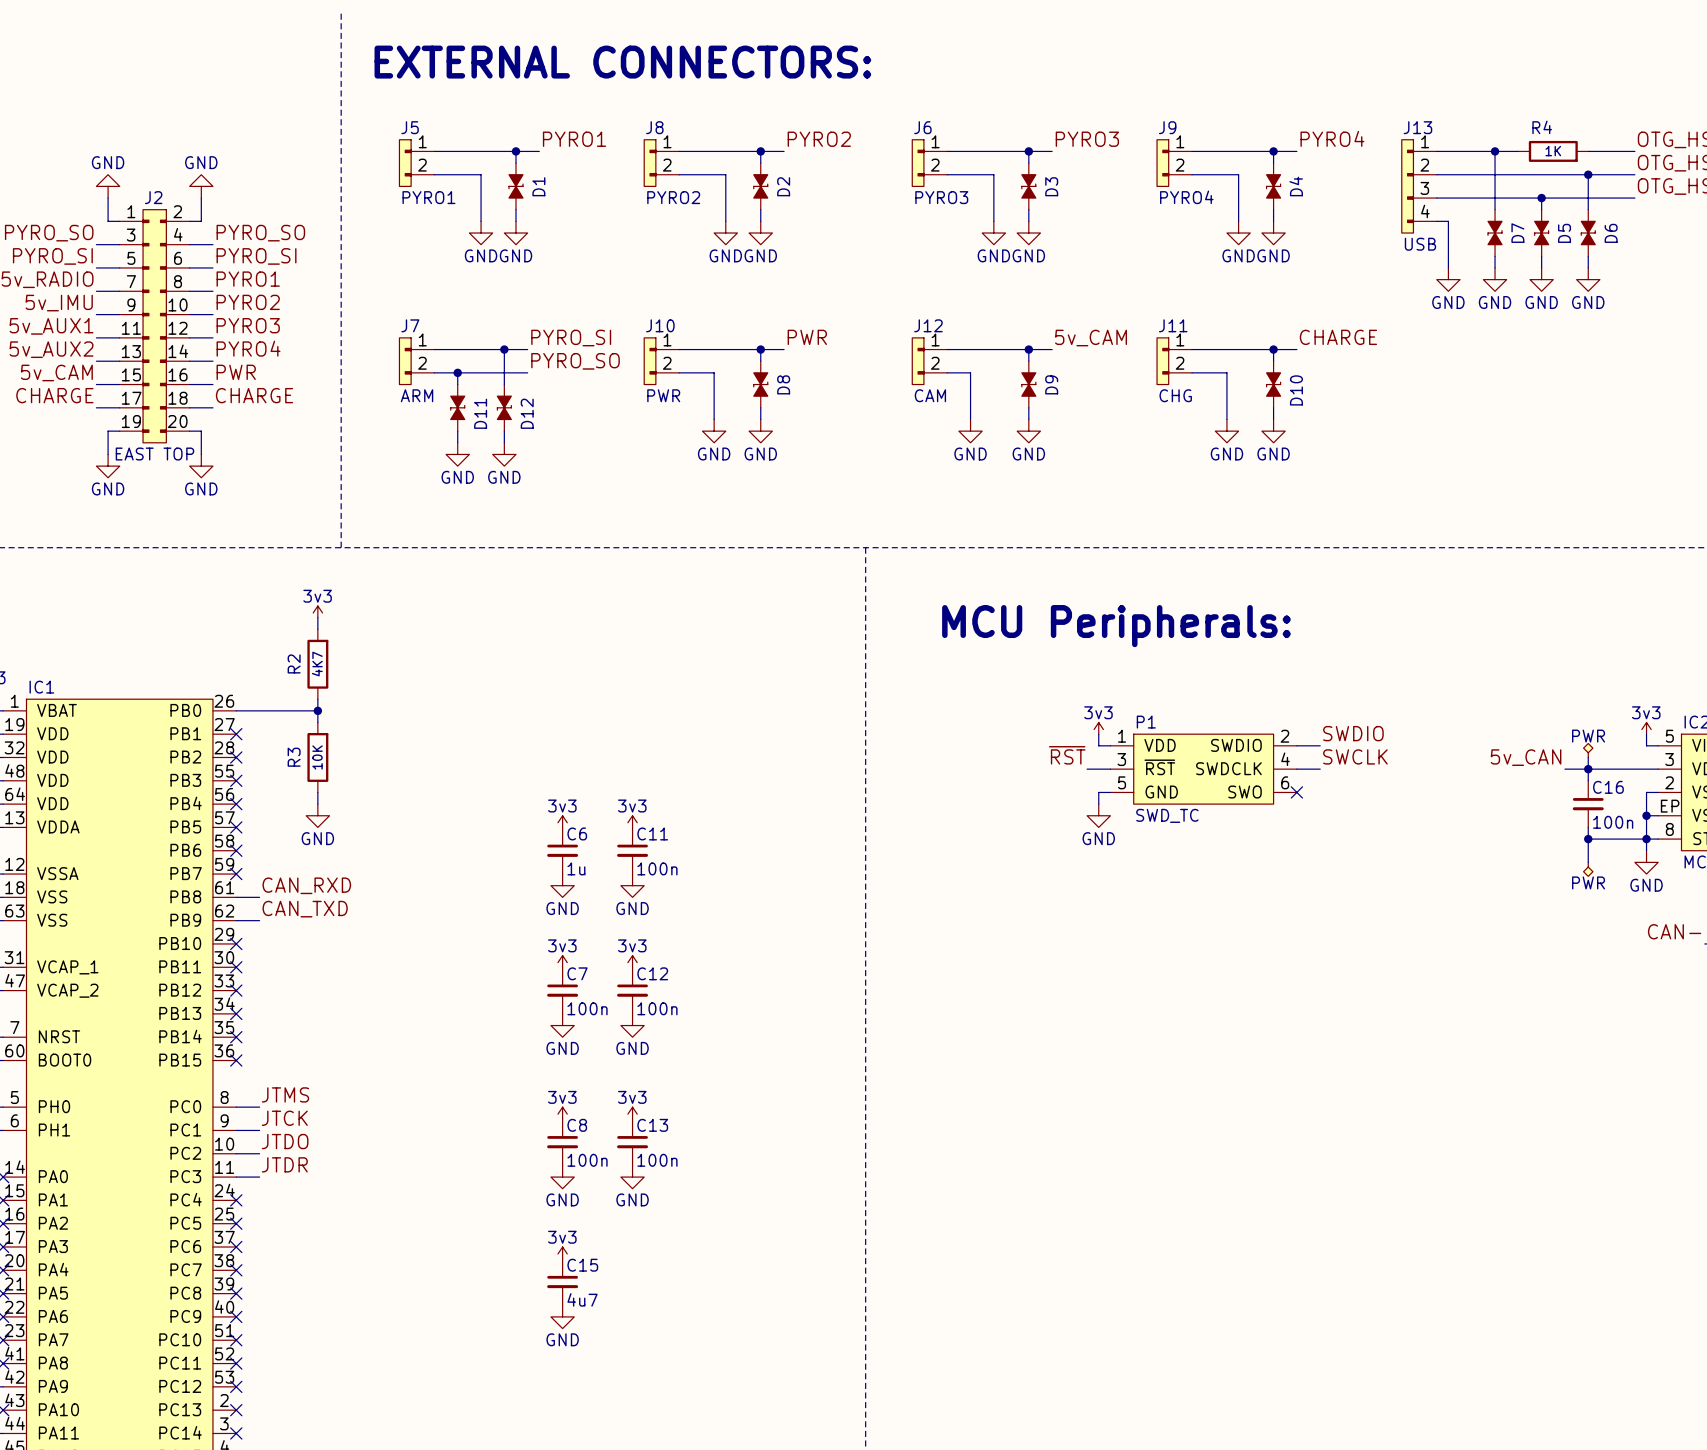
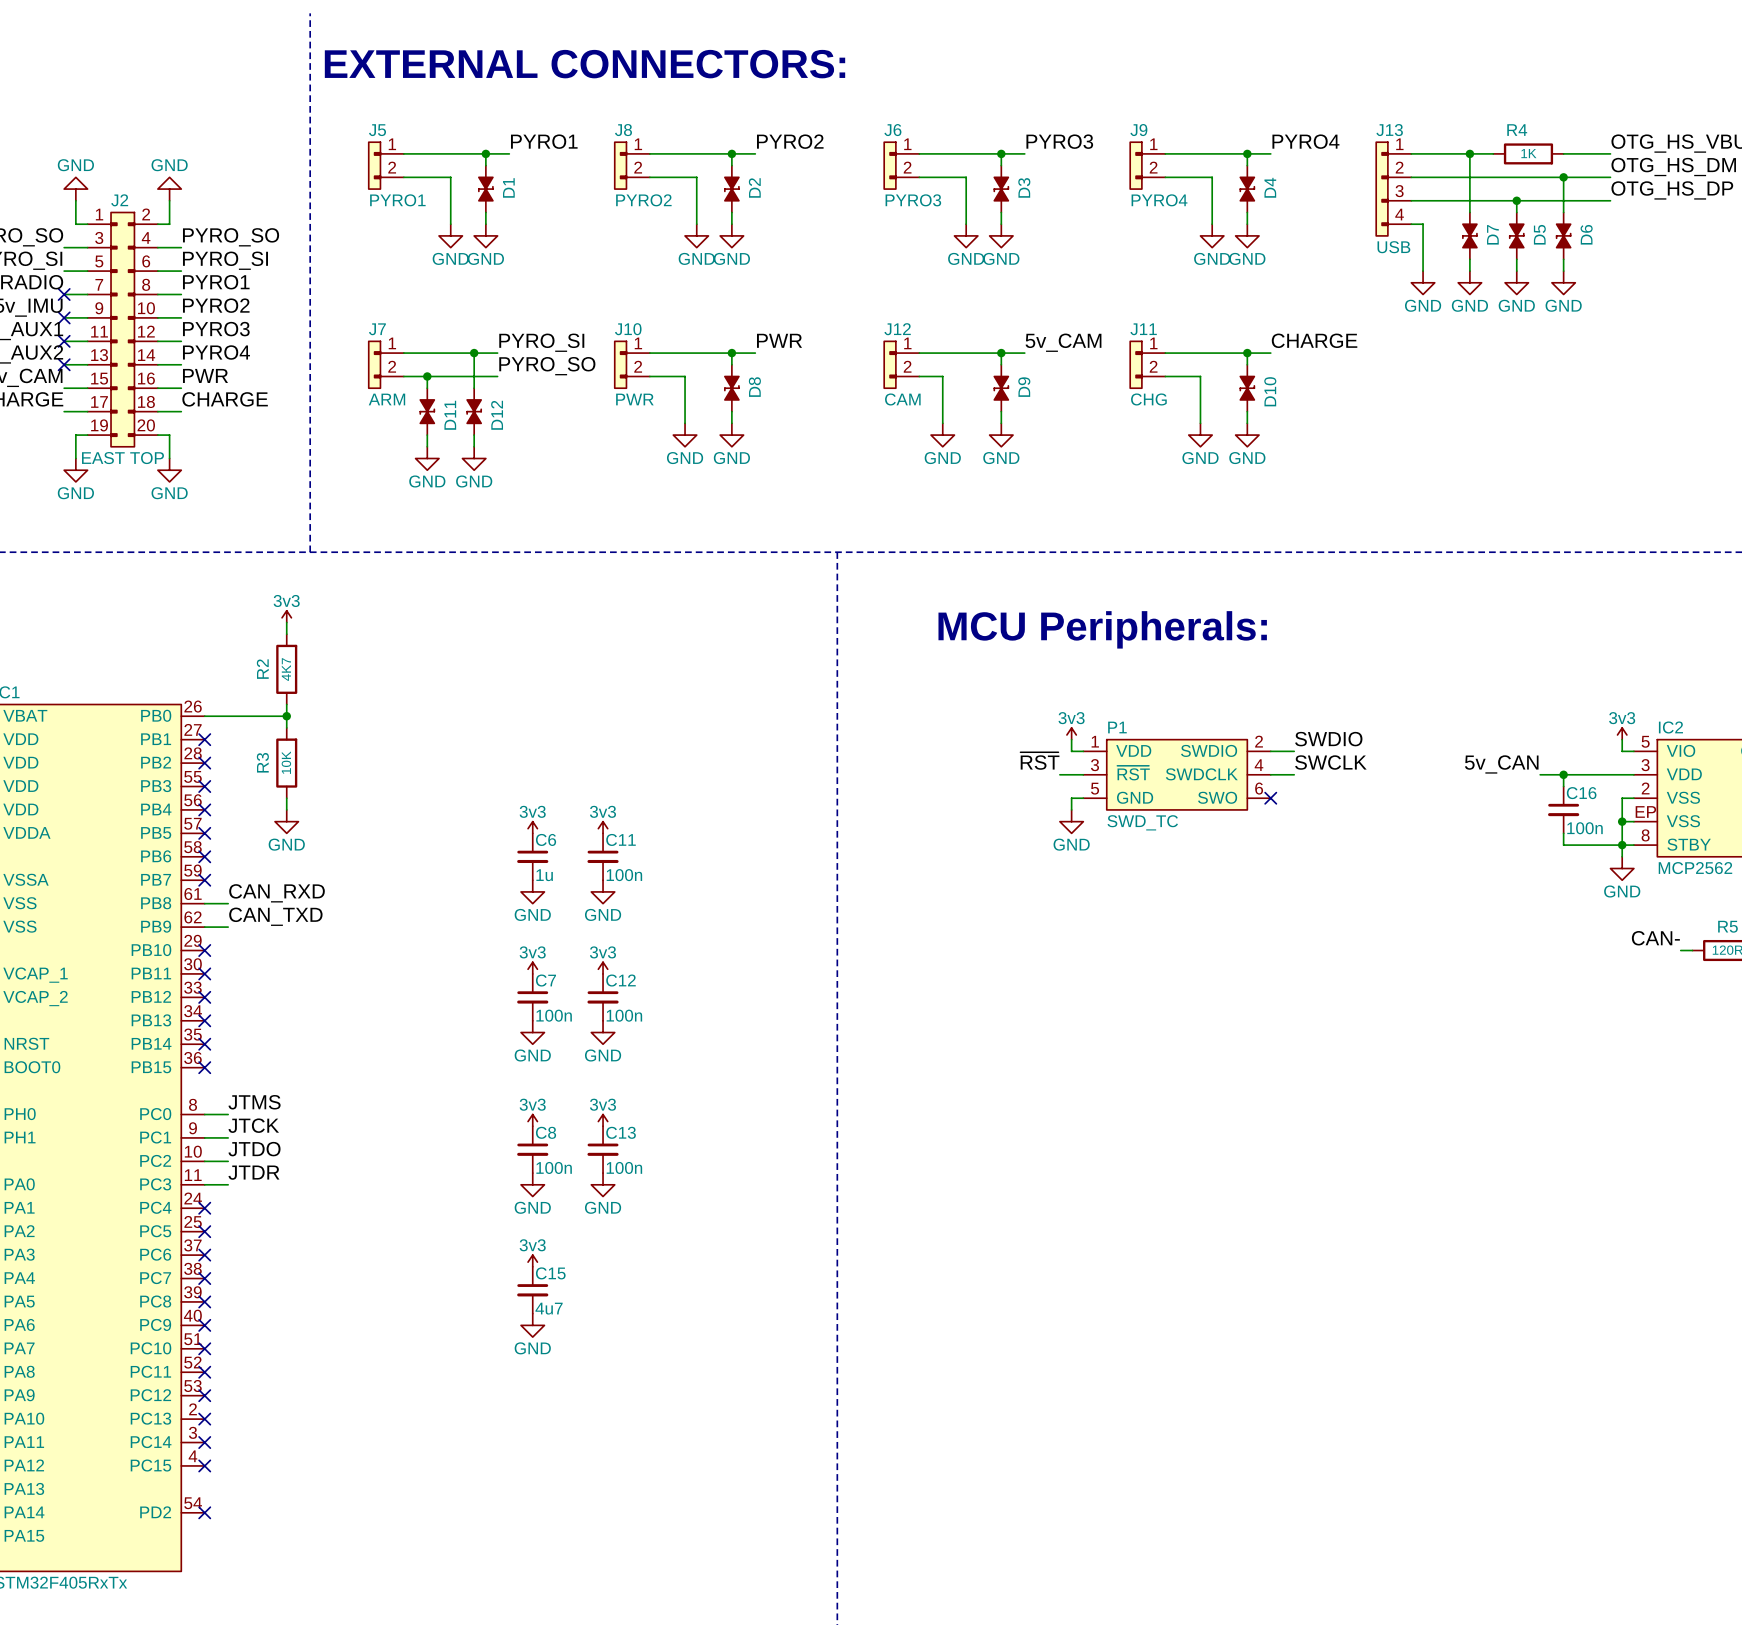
no-connect mark: none -> (64, 294)
no-connect mark: none -> (64, 317)
no-connect mark: none -> (64, 341)
no-connect mark: none -> (64, 364)
power symbol: PWR (1588, 750) -> none
wire: (1588, 757) (1588, 769) -> none
wire: (1588, 839) (1588, 862) -> none
junction: (1588, 839) -> none
power symbol: PWR (1588, 869) -> none

